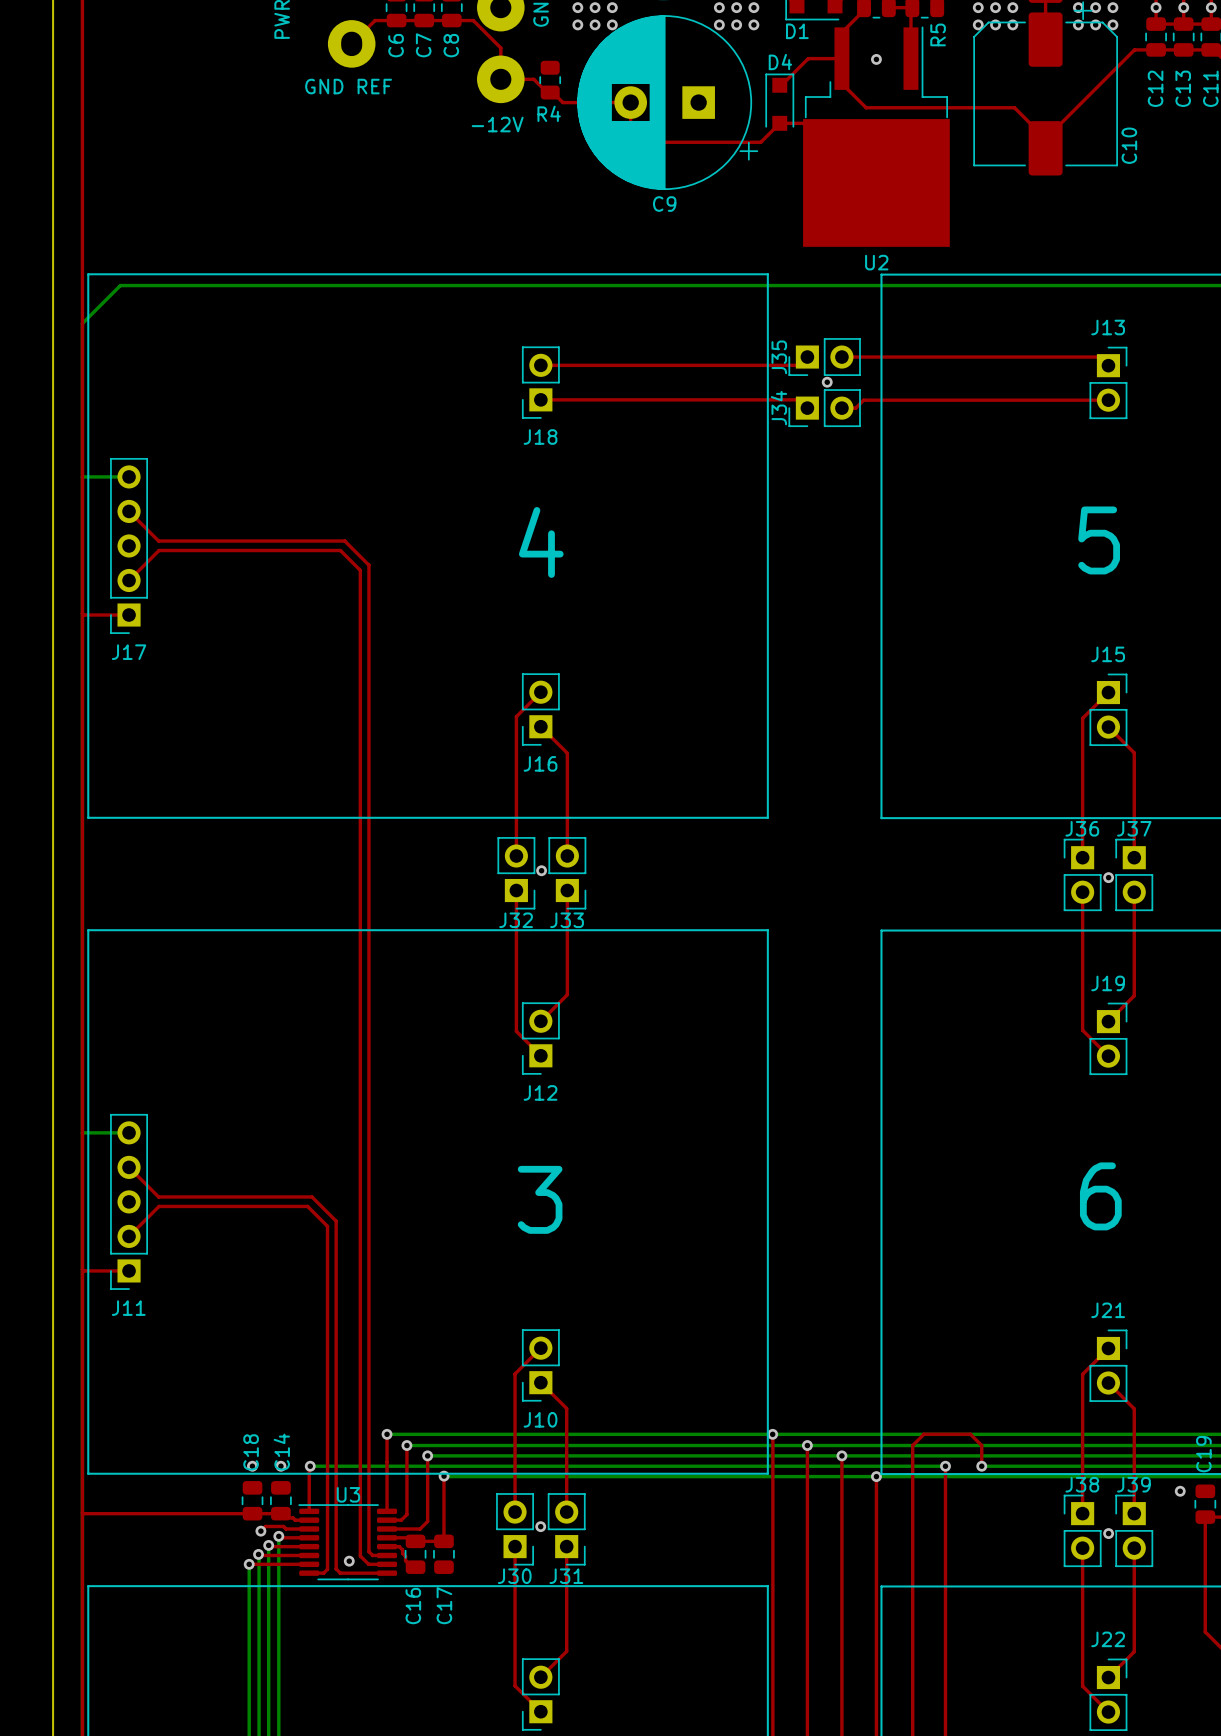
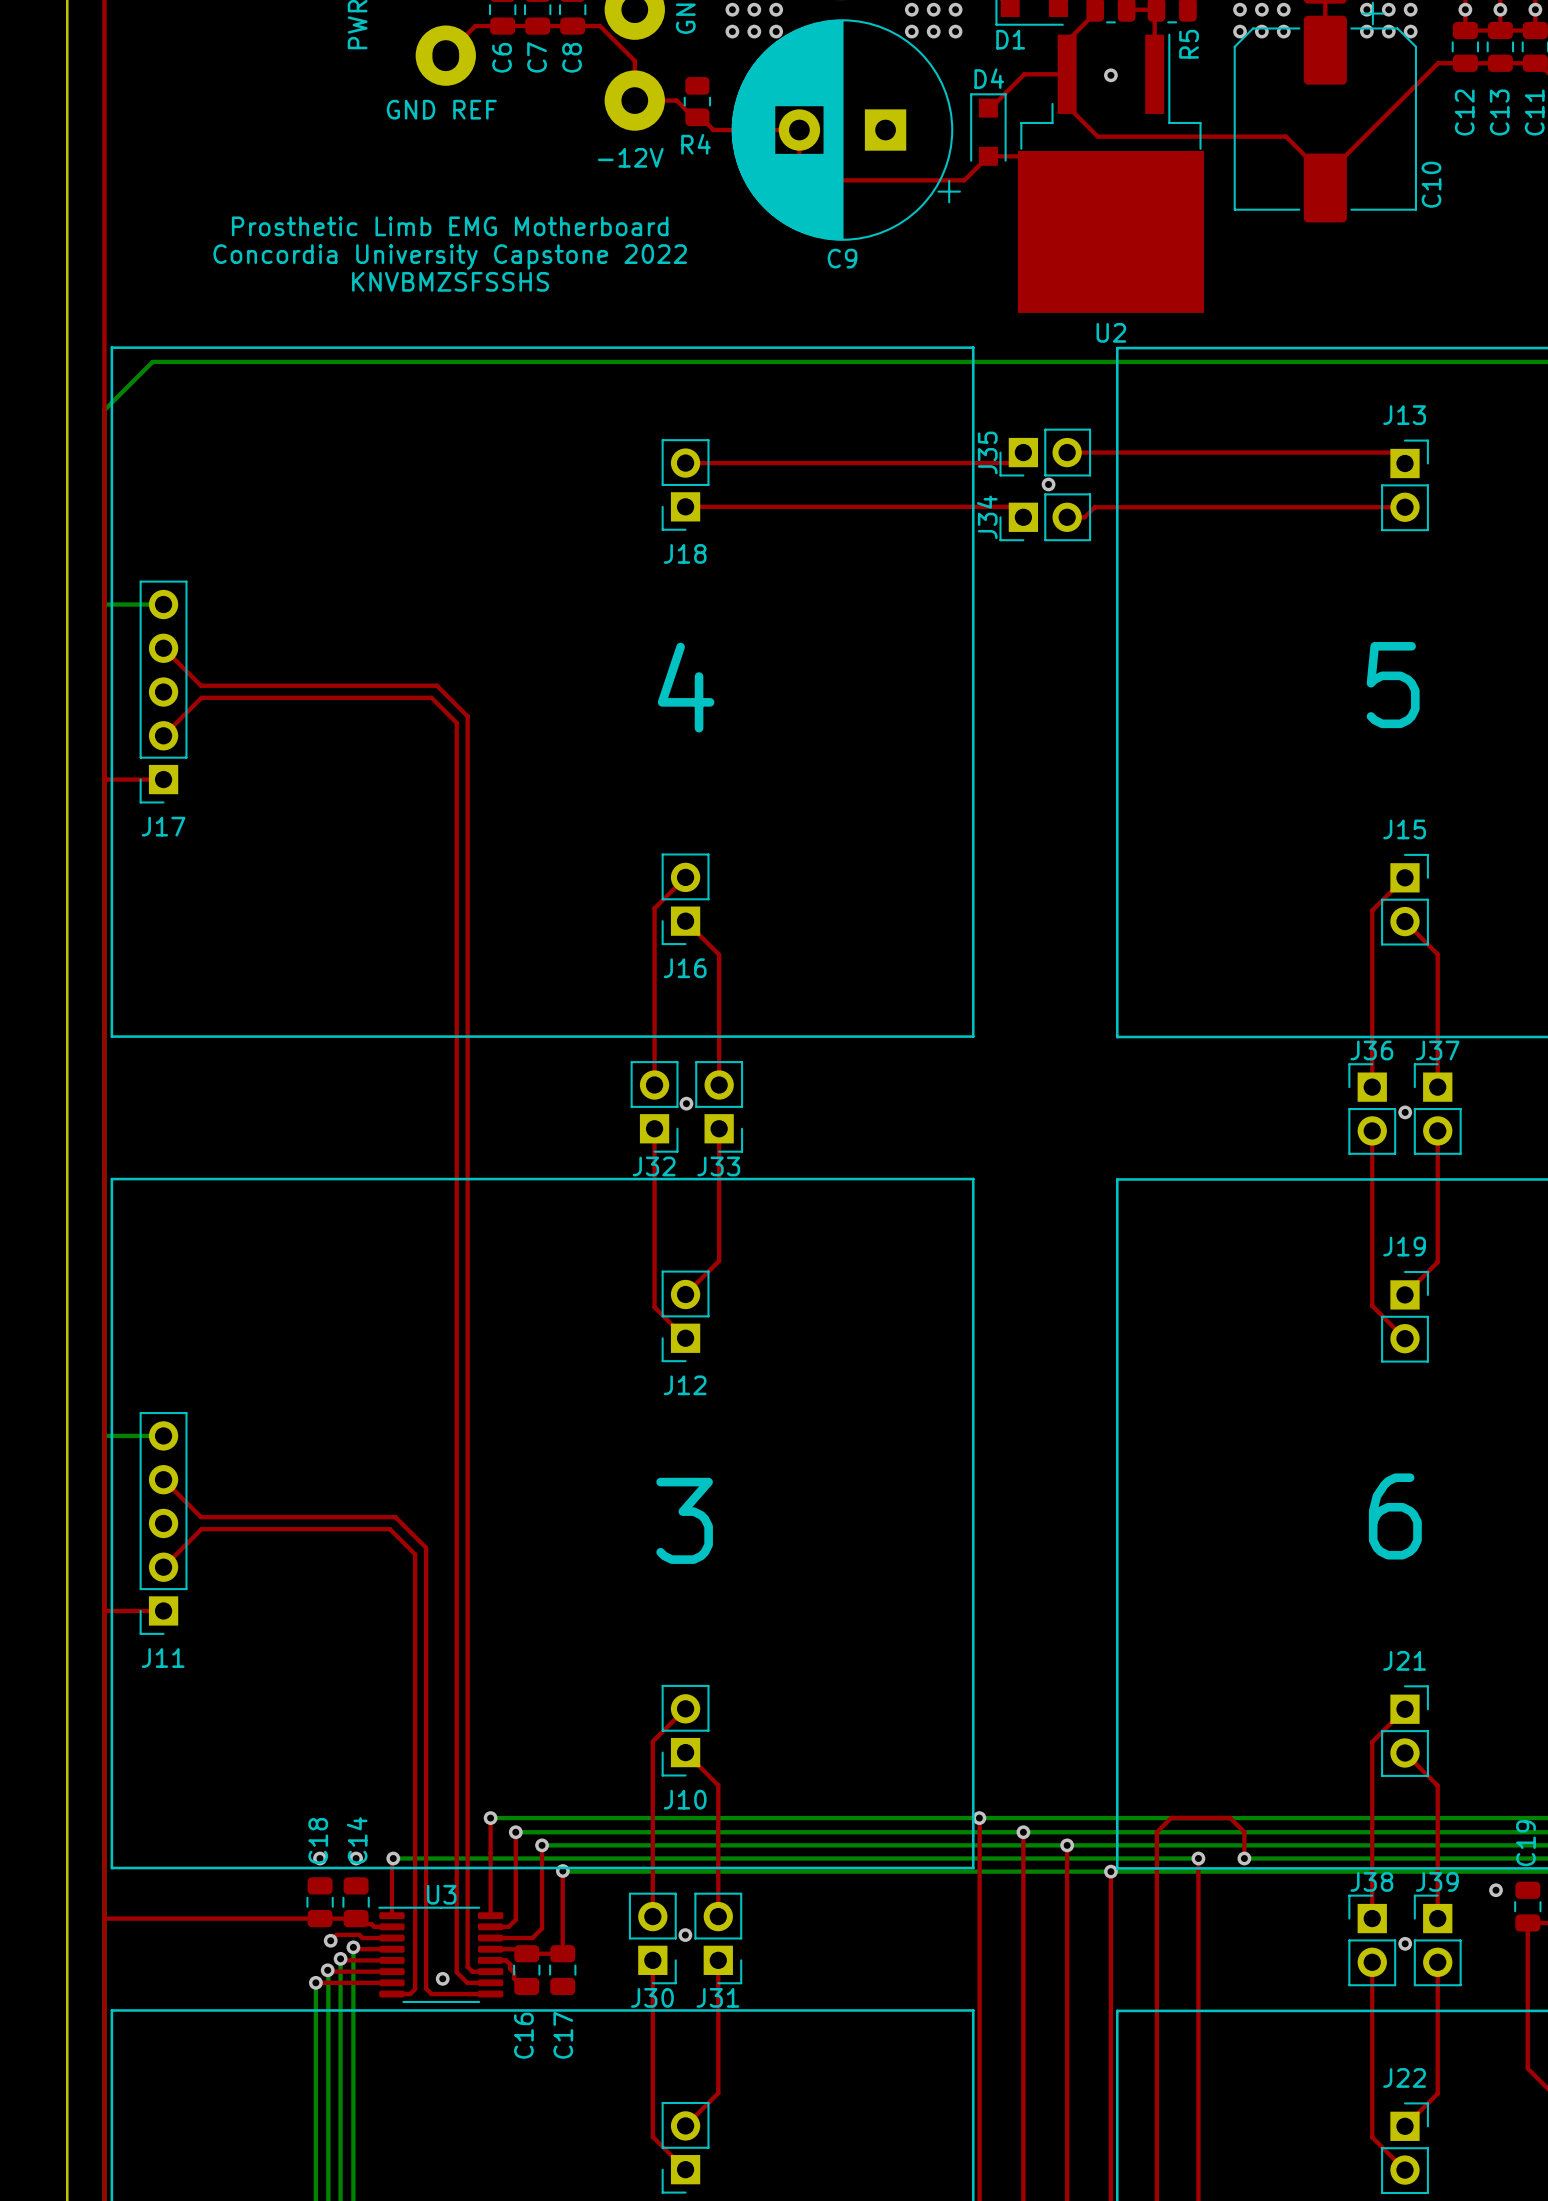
text: none -> Prosthetic Limb EMG Motherboard (450, 226)
text: none -> Concordia University Capstone 2022 (450, 256)
text: none -> KNVBMZSFSSHS (450, 281)

